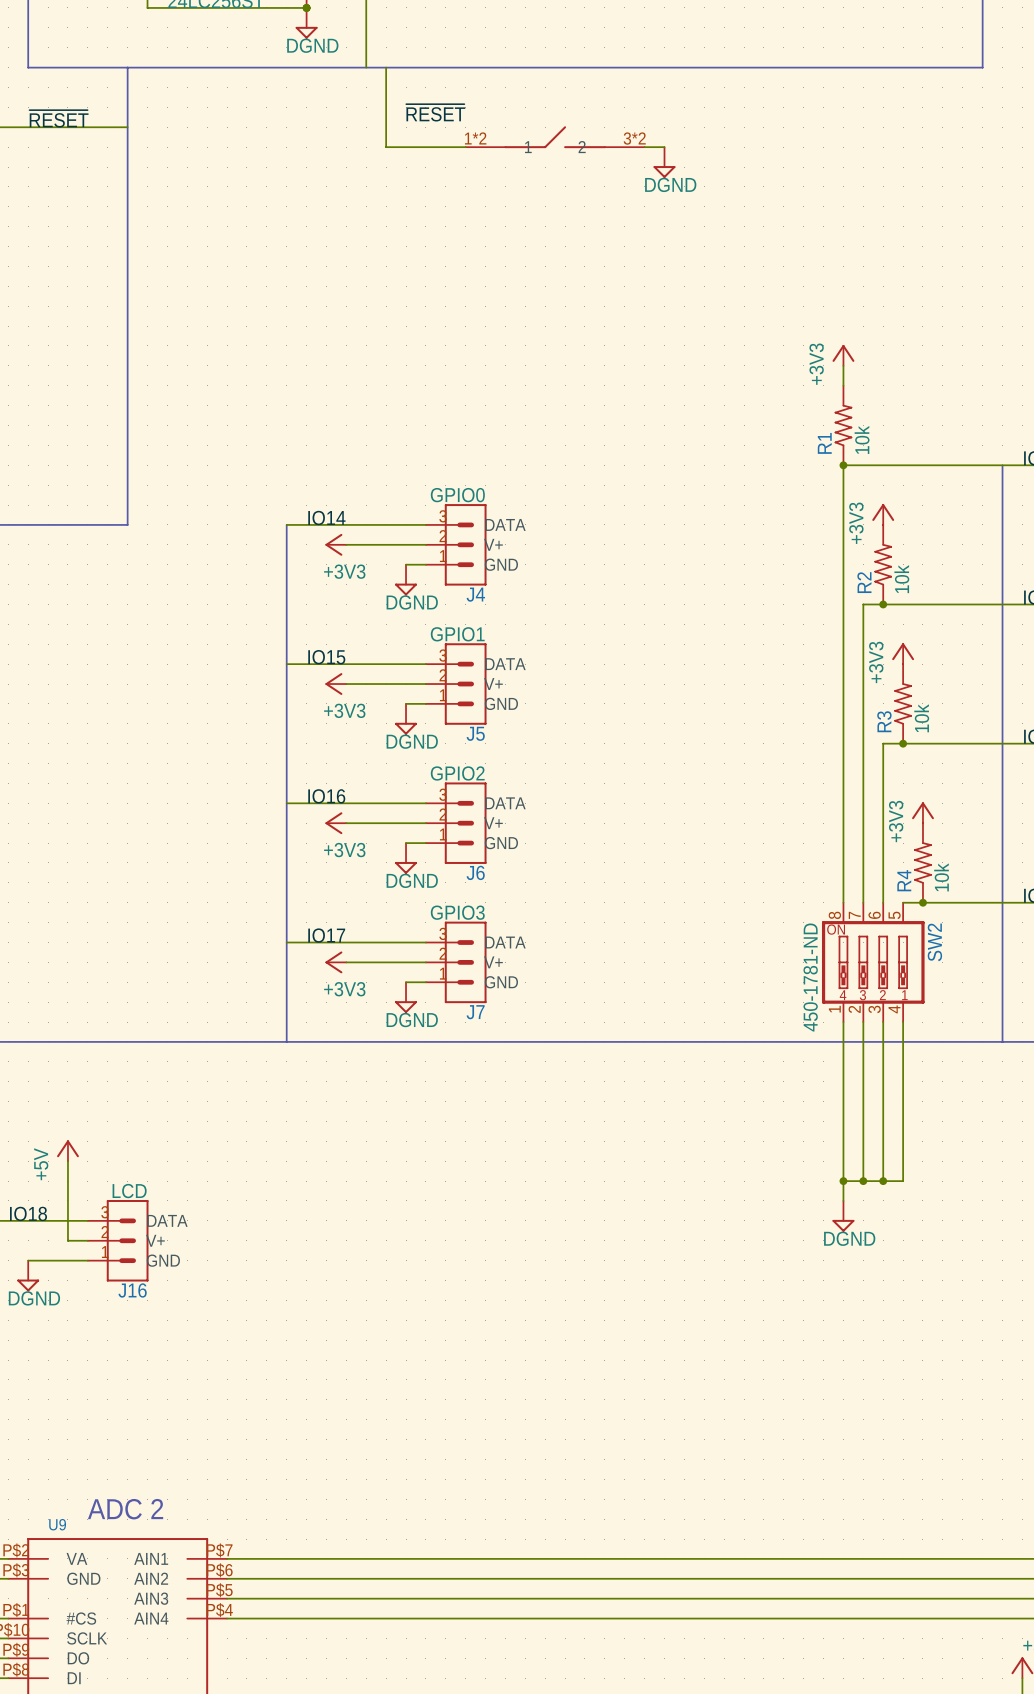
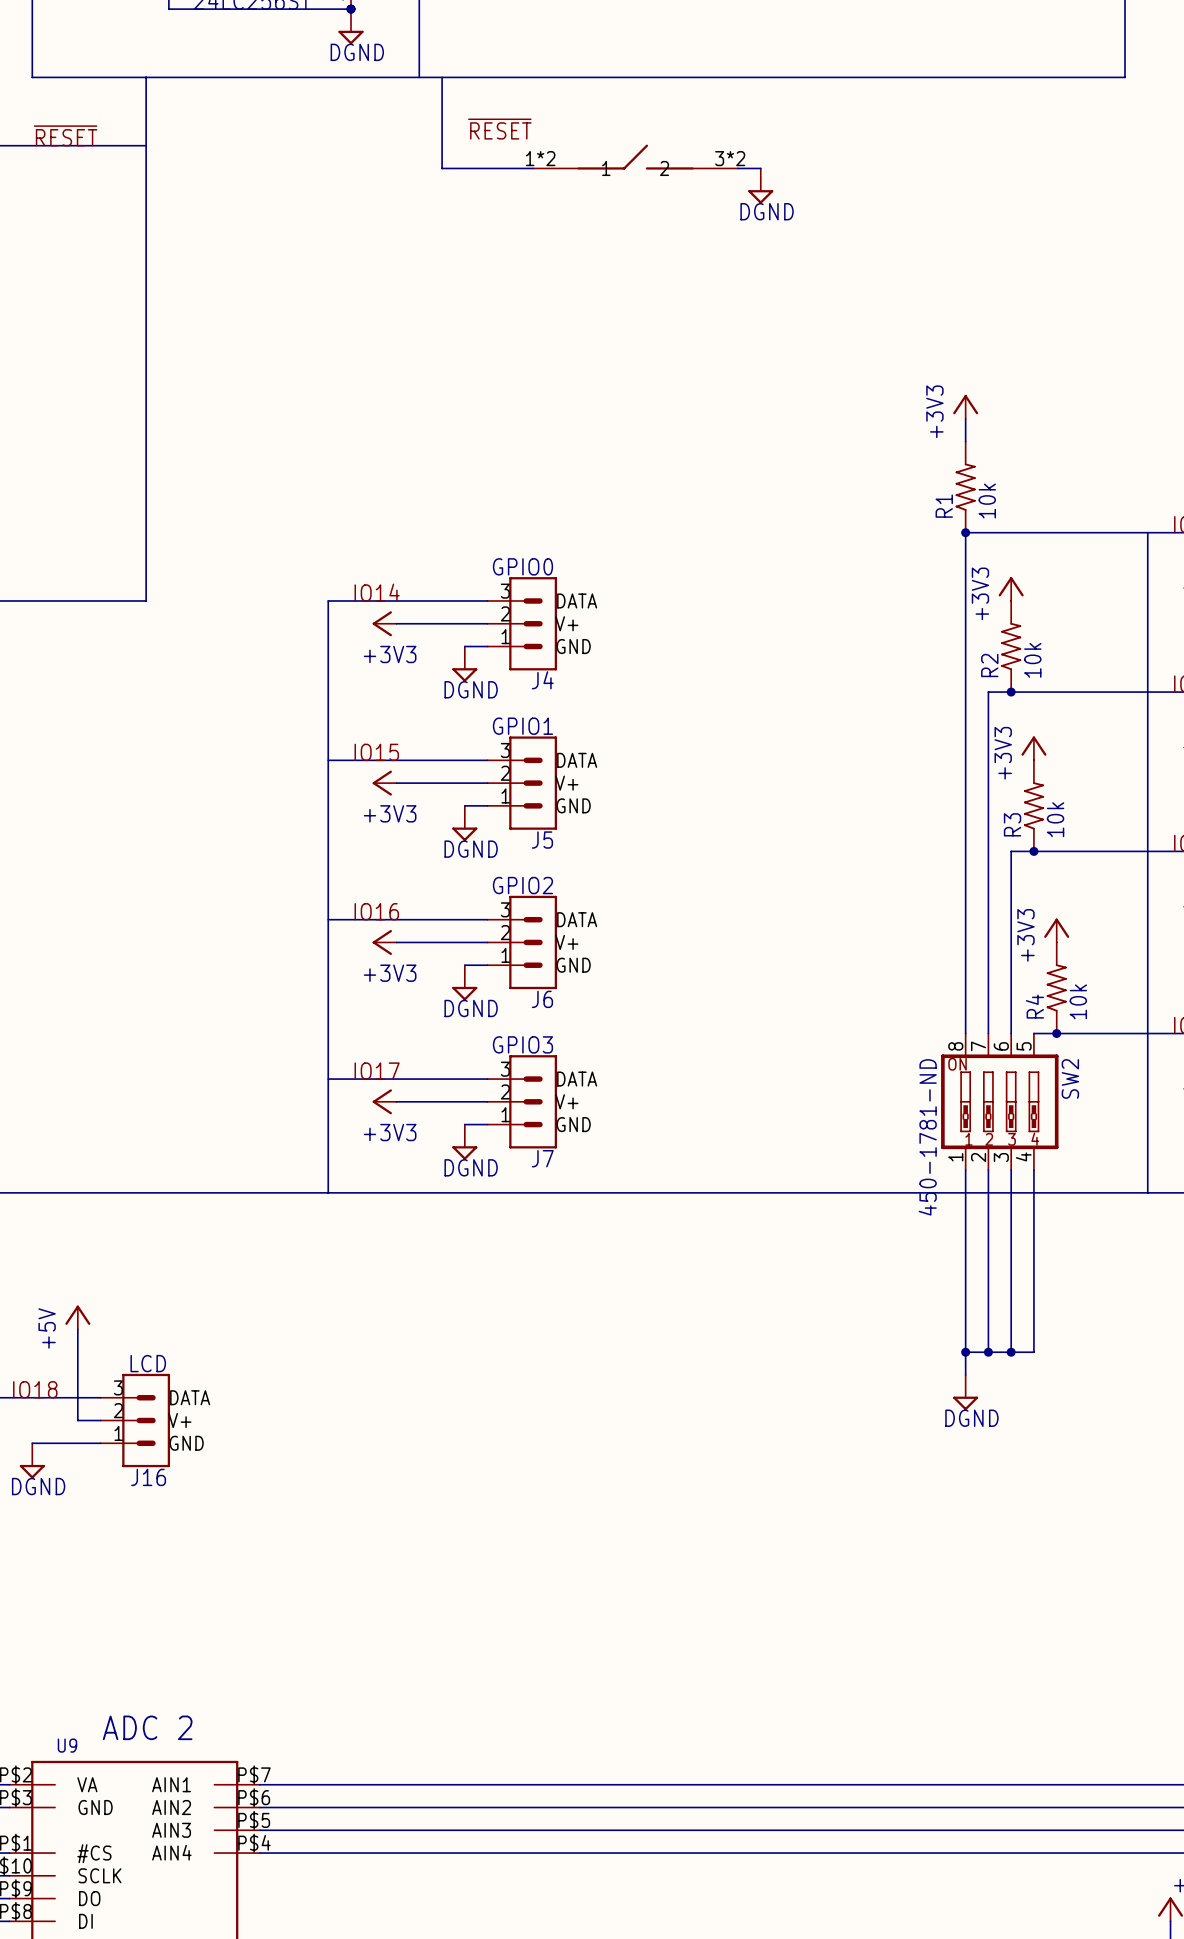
SW2 text position: 4 (843, 995) -> 4 (1035, 1139)
SW2 text: 3 (862, 995) -> 2 (989, 1139)
SW2 text: 2 (882, 995) -> 3 (1012, 1139)
SW2 text position: 1 (904, 995) -> 1 (969, 1139)

